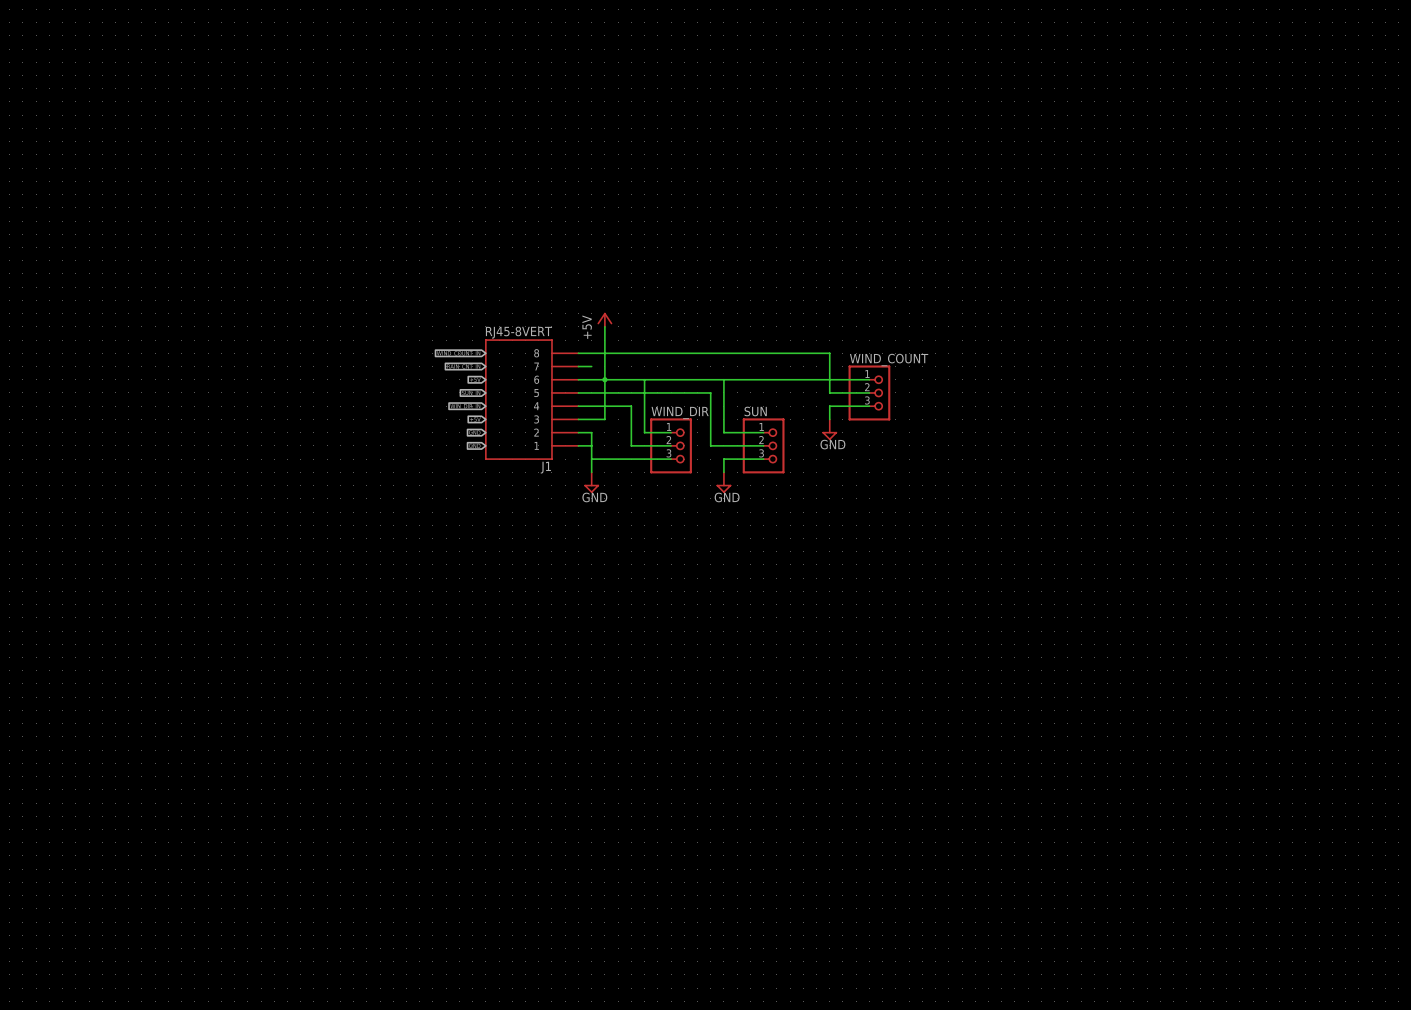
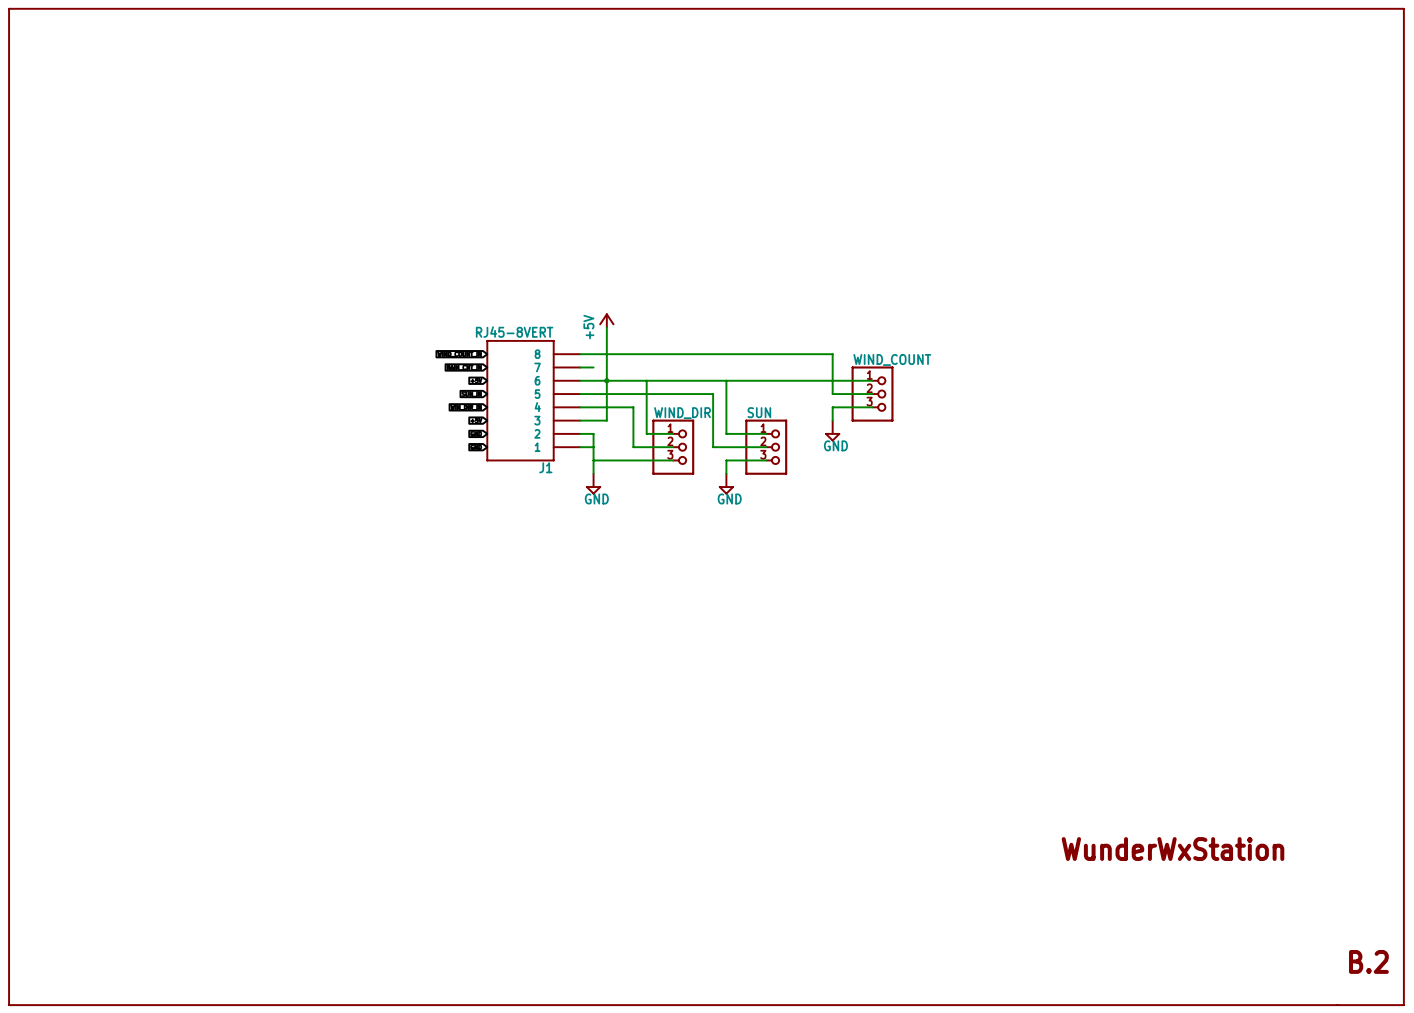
part: none -> (706, 506)
text: none -> WunderWxStation (1172, 849)
text: none -> B.2 (1368, 961)

